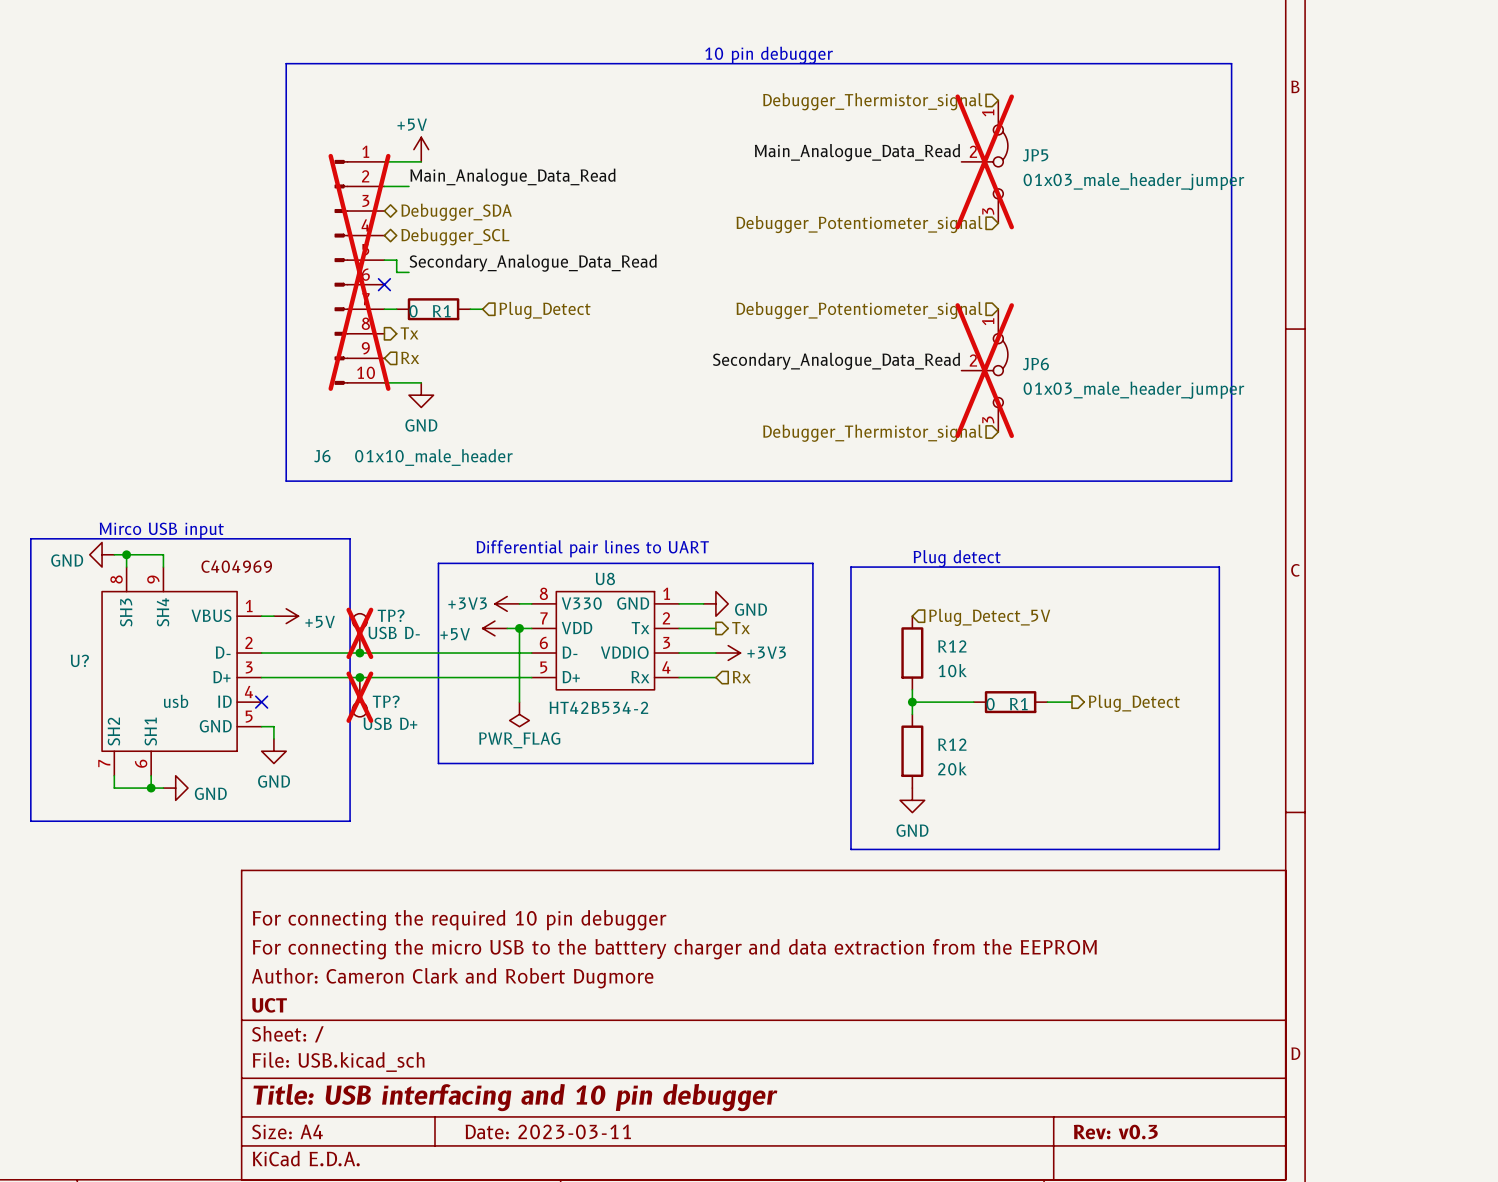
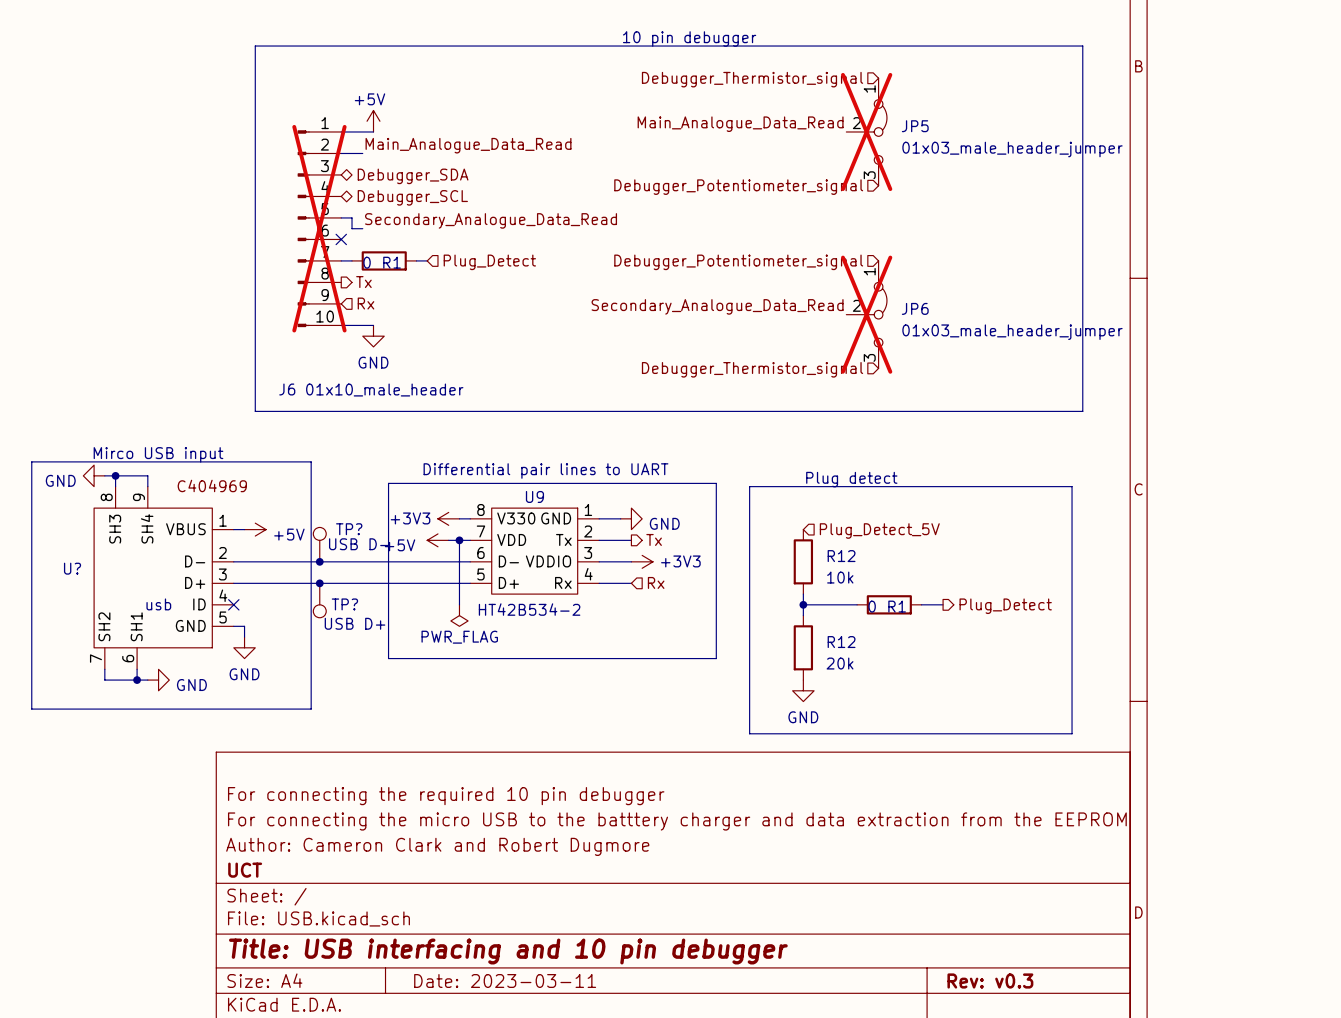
U8 name: U8 (605, 578) -> U9 (534, 496)
TP? do-not-place cross: (359, 633) -> none
TP? do-not-place cross: (359, 697) -> none

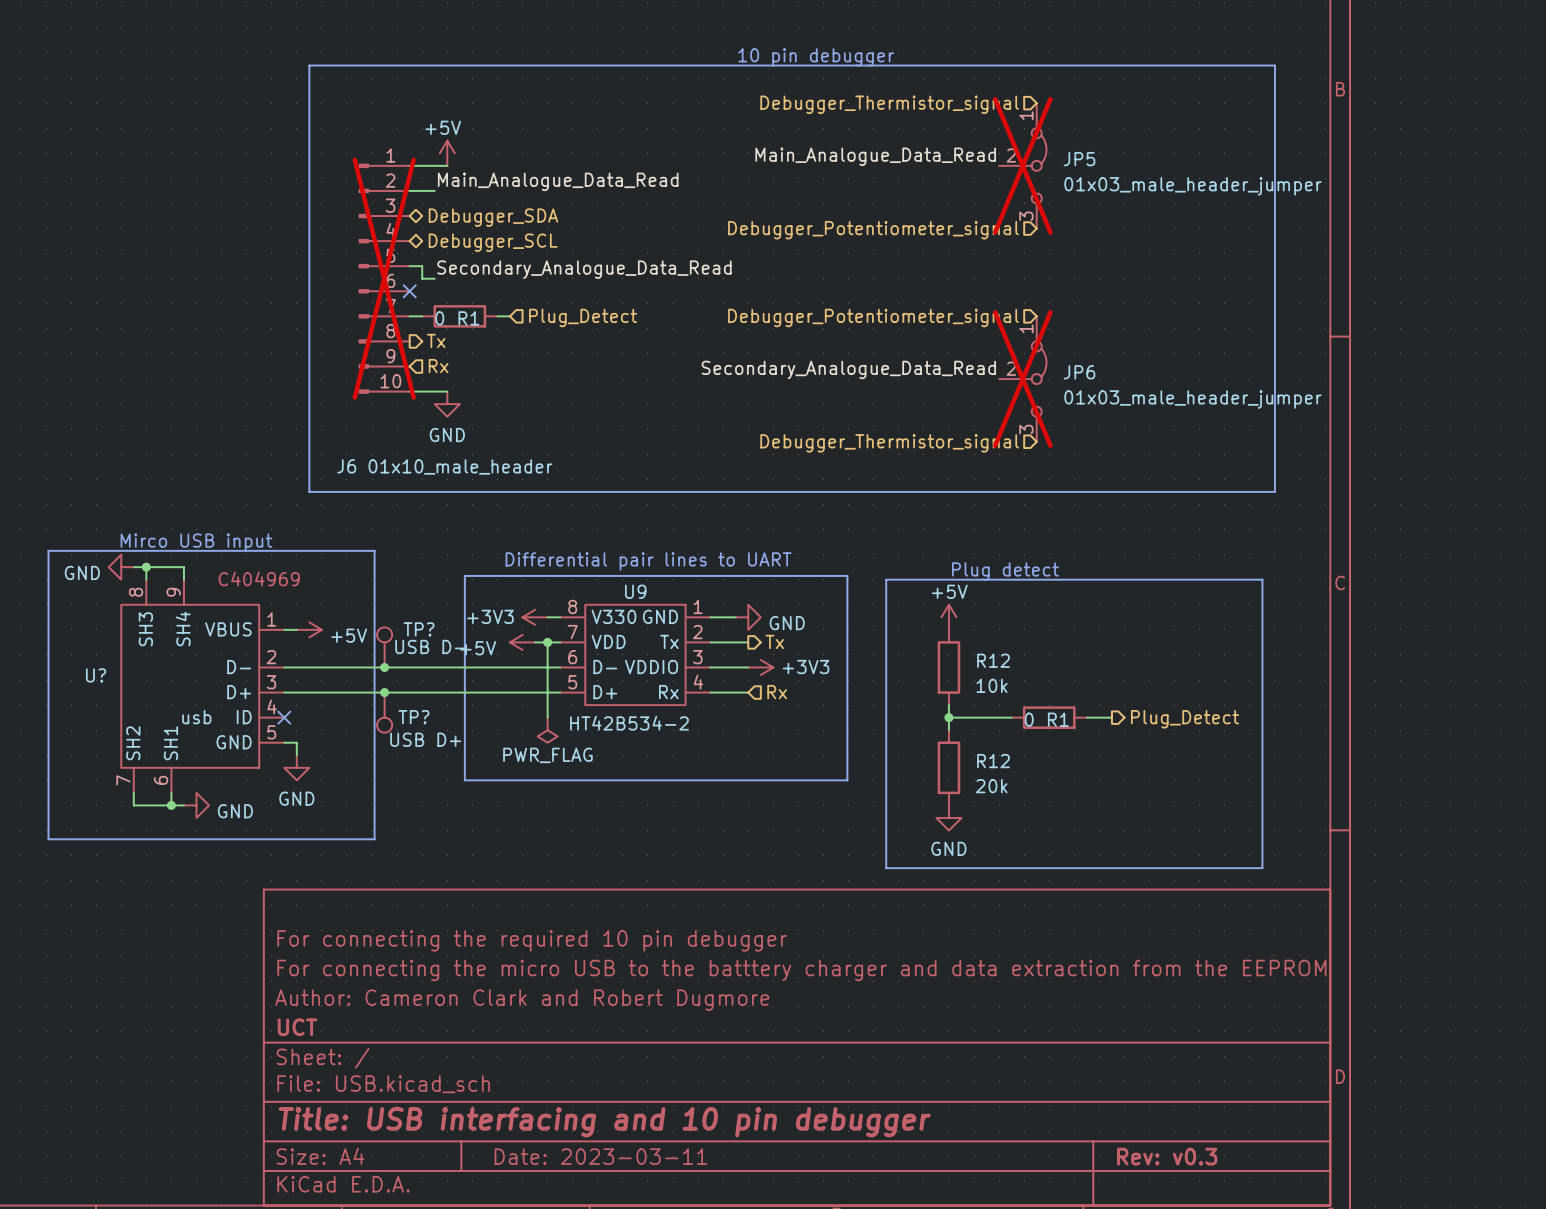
power symbol: none -> +5V (948, 617)
hierarchical label: Plug_Detect_5V (879, 531) -> none

